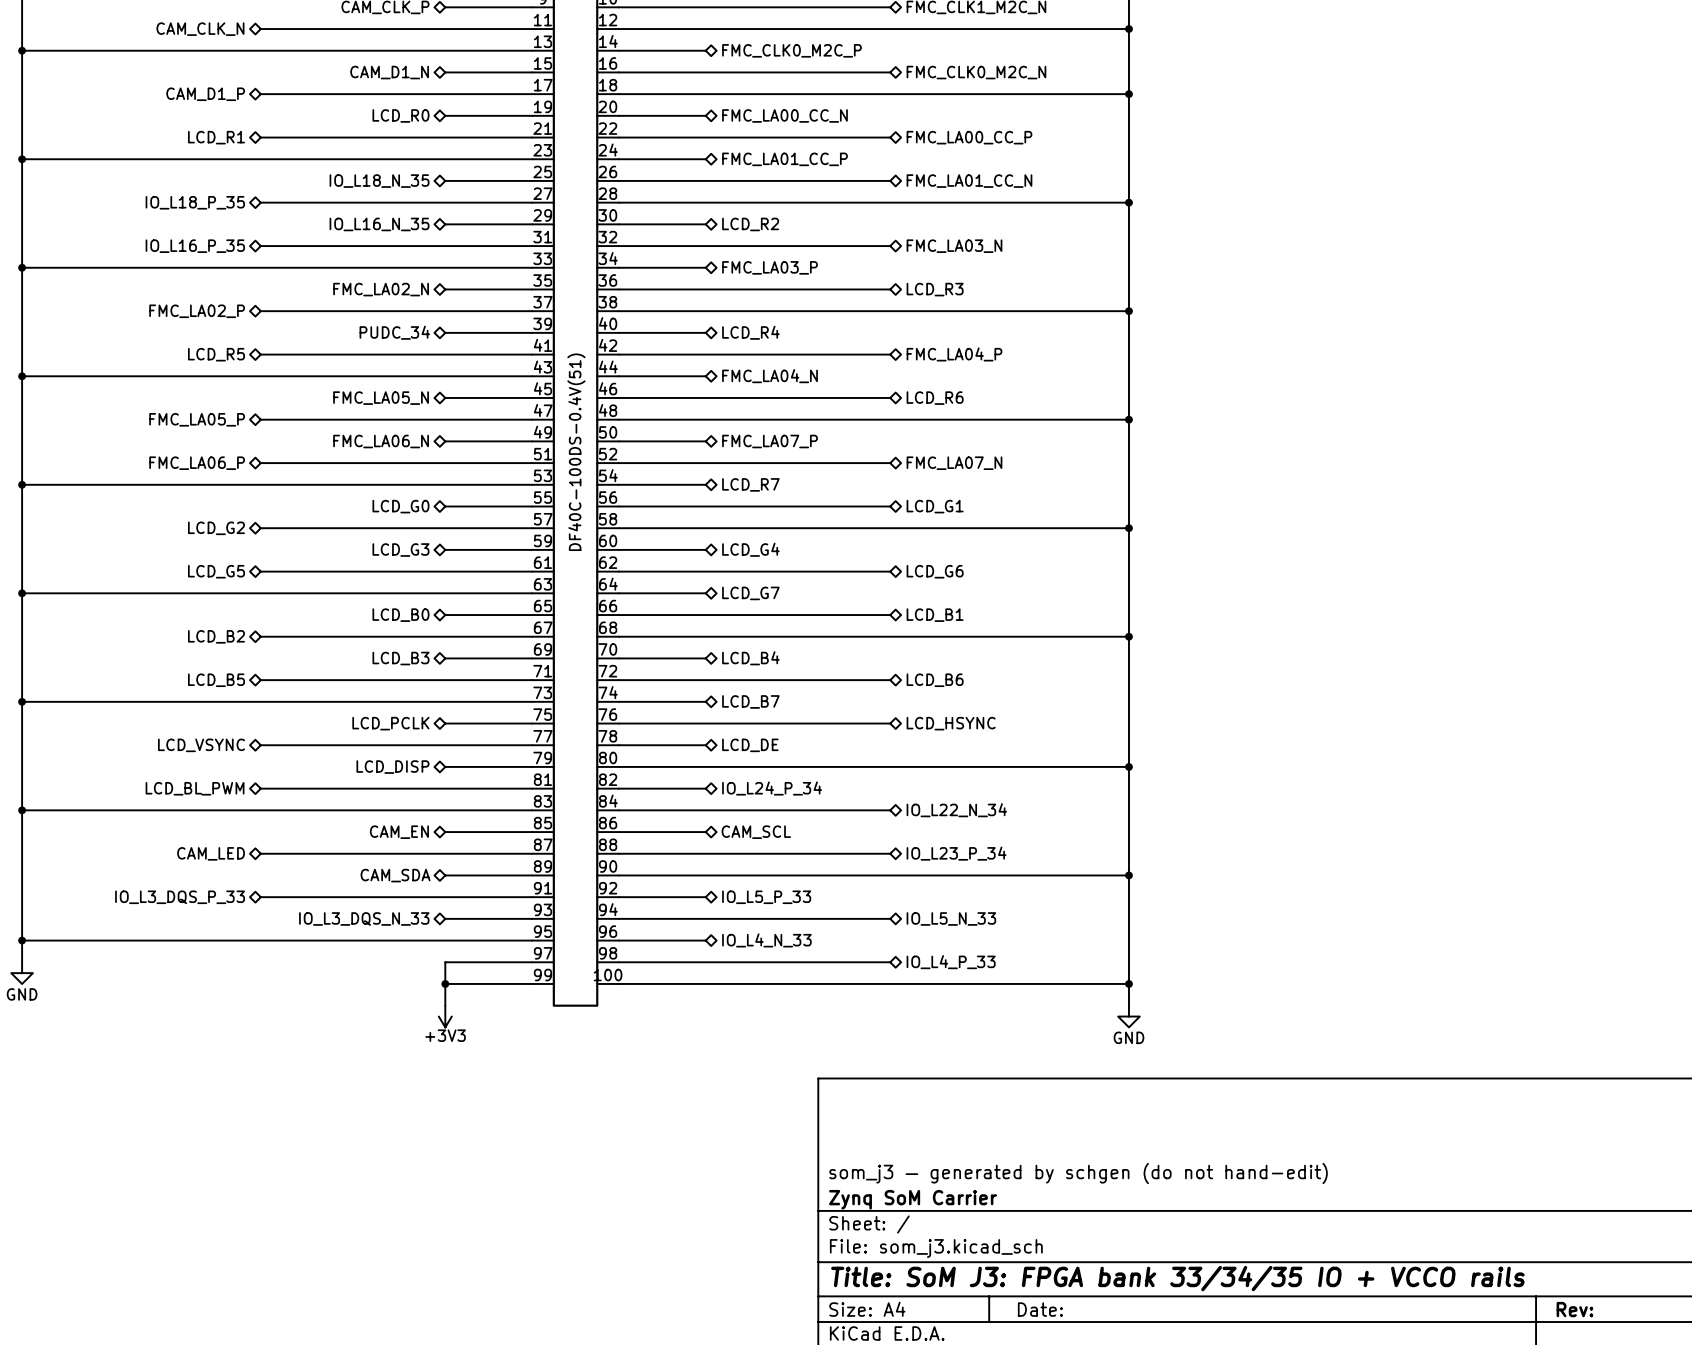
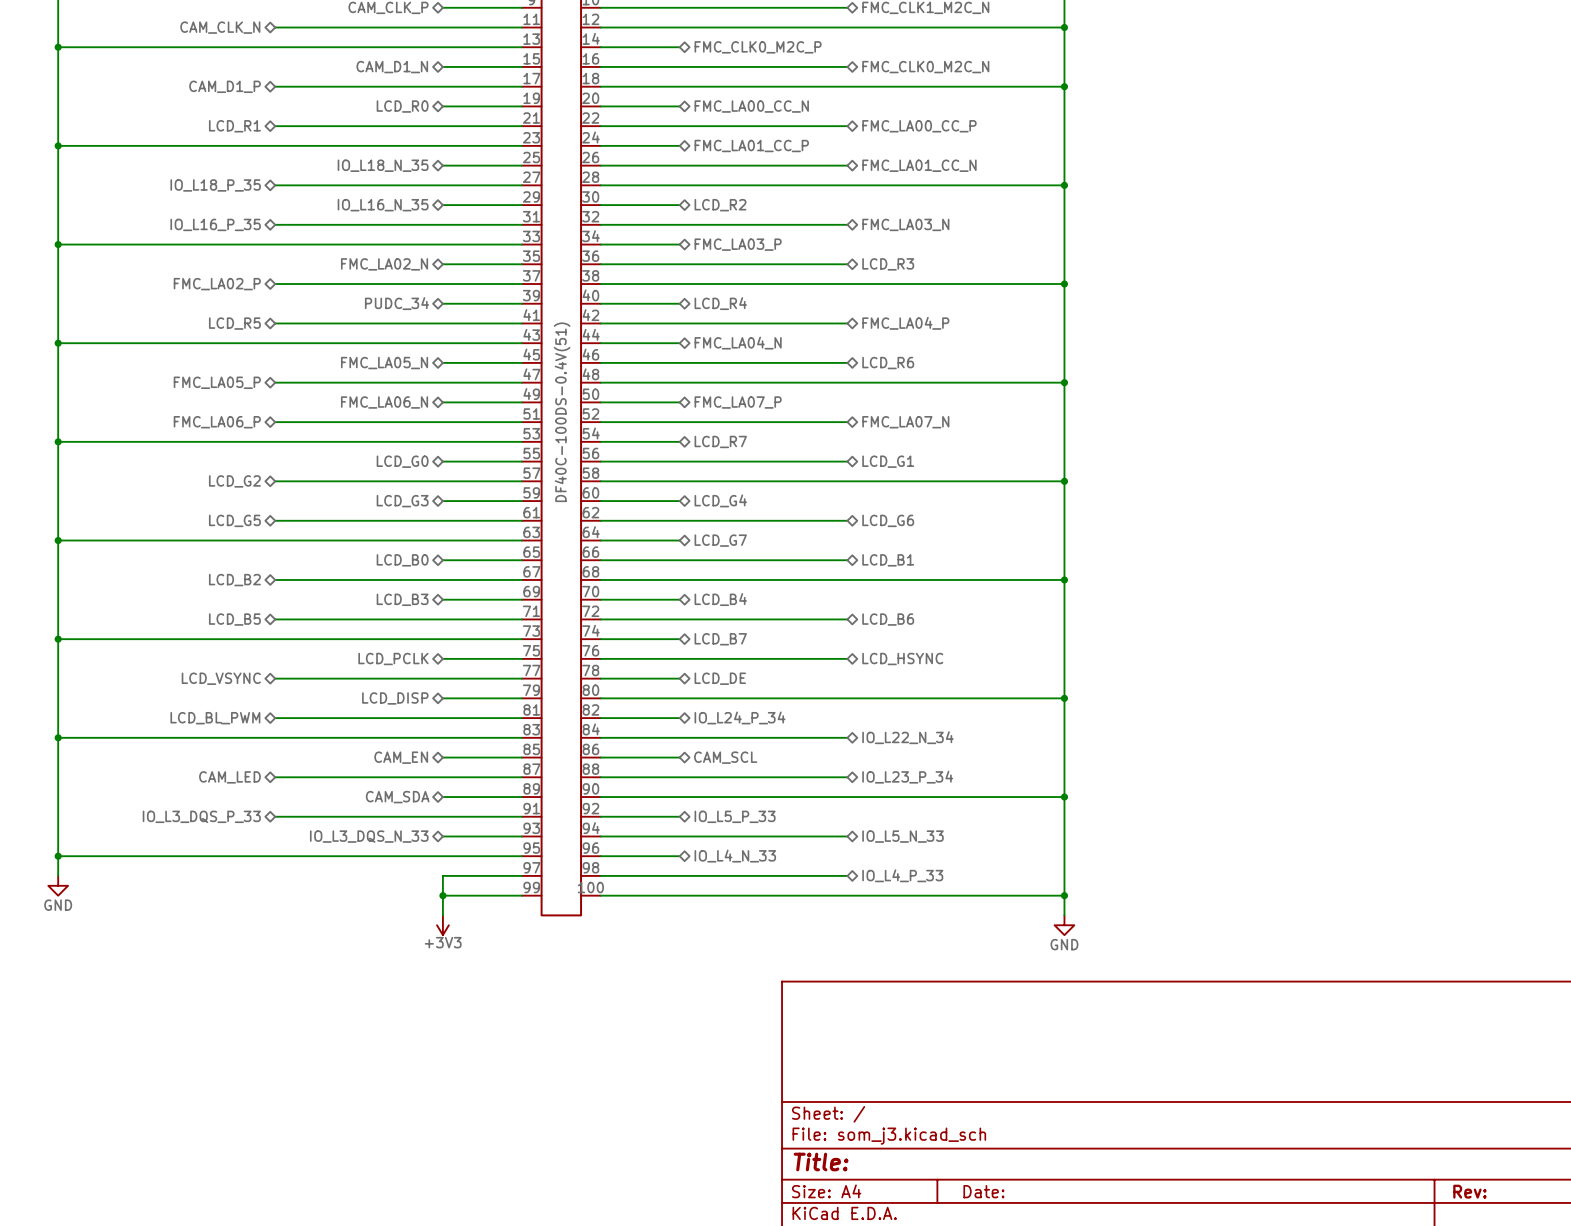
title block: som_j3 — generated by schgen (do not hand-edit) (1078, 1173) -> none
title block: Zynq SoM Carrier (913, 1199) -> none
title block: Title: SoM J3: FPGA bank 33/34/35 IO + VCCO rails (1177, 1278) -> Title: (821, 1162)

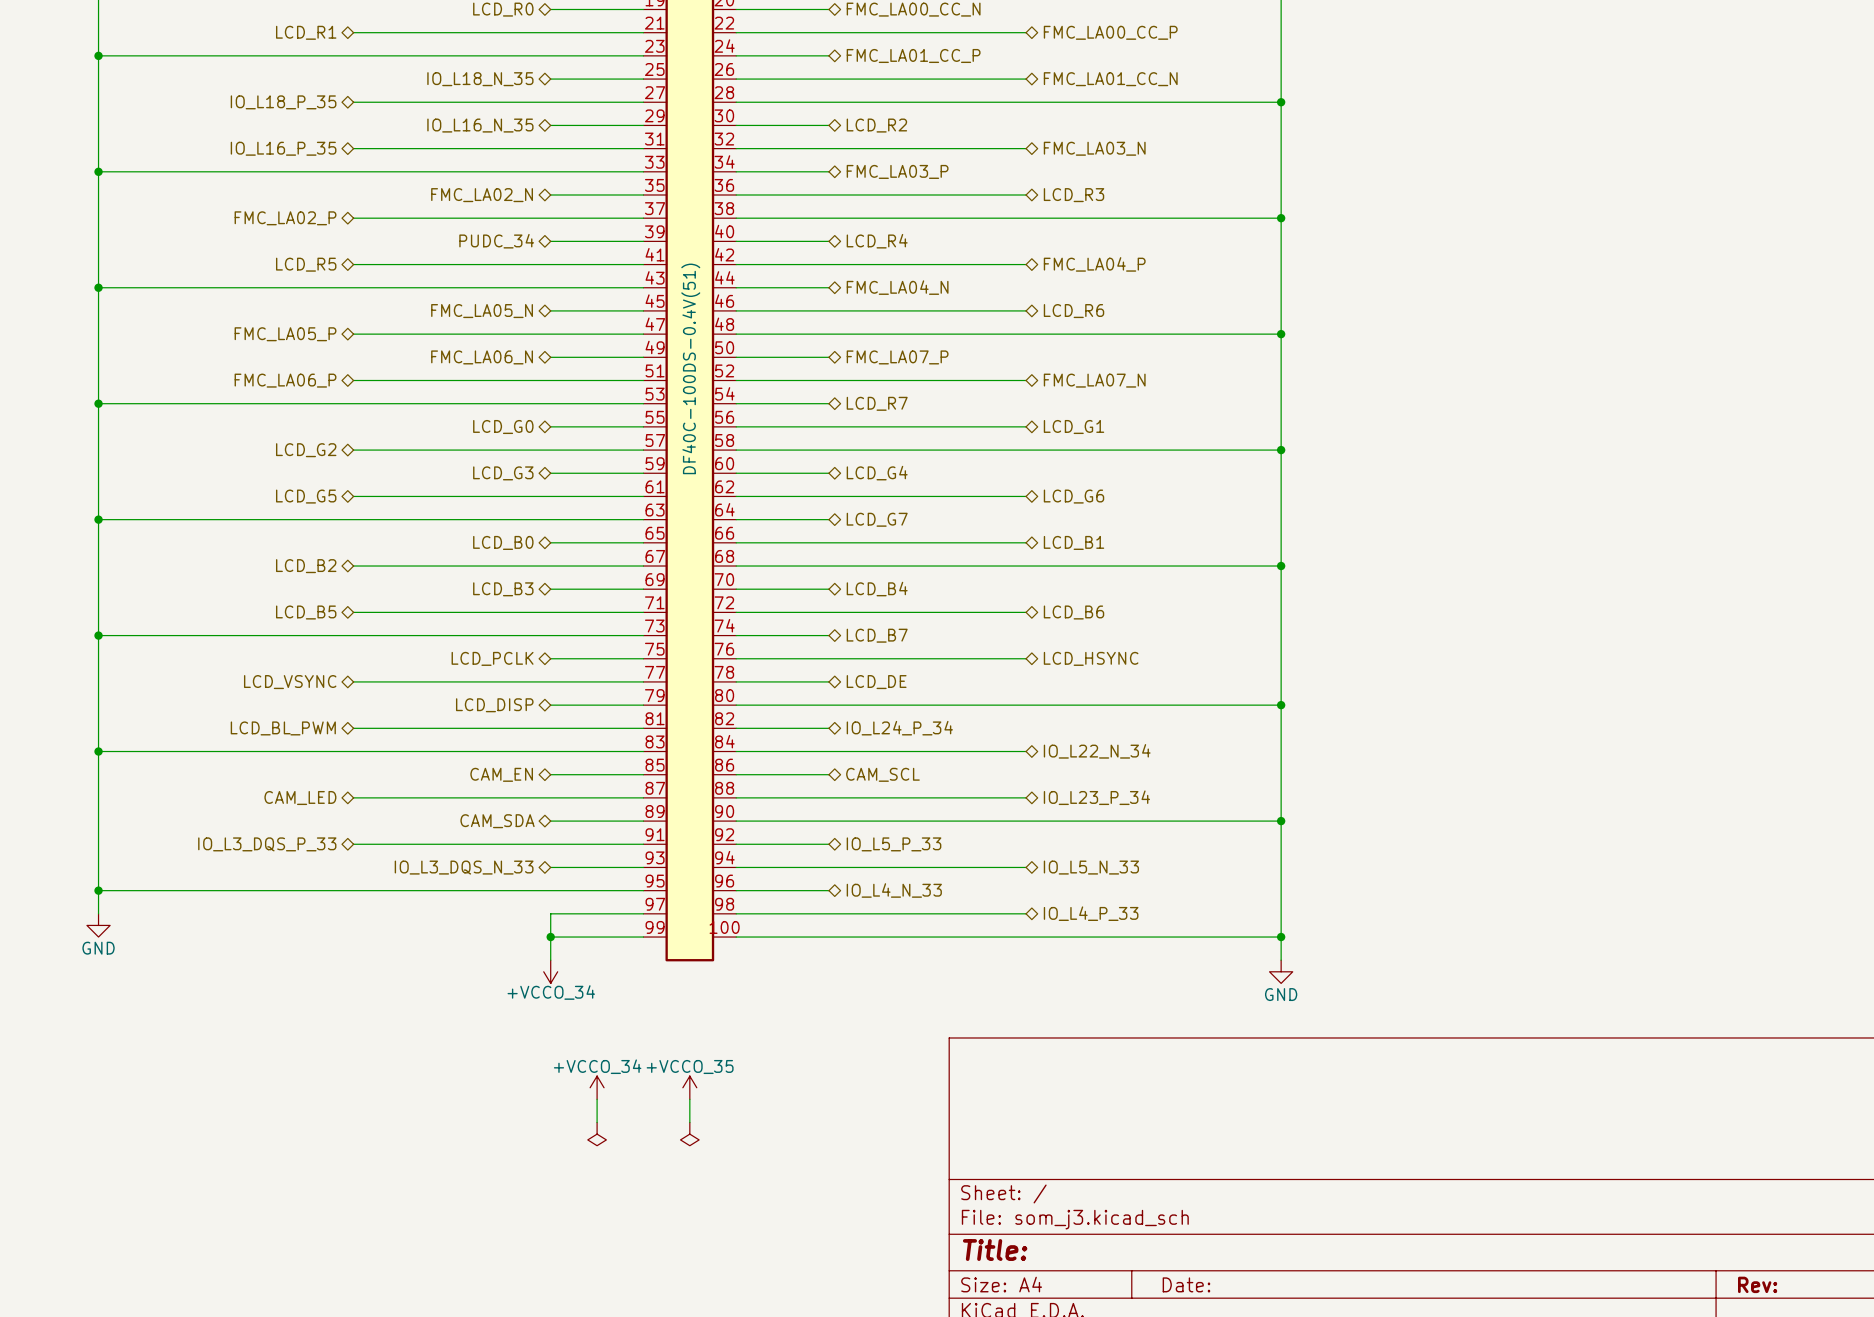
power symbol: +3V3 (442, 925) -> +VCCO_34 (550, 971)
power symbol: none -> +VCCO_34 (597, 1087)
power symbol: none -> +VCCO_35 (689, 1087)
wire: none -> (597, 1099) (597, 1122)
wire: none -> (689, 1099) (689, 1122)
power symbol: none -> (597, 1134)
power symbol: none -> (689, 1134)

